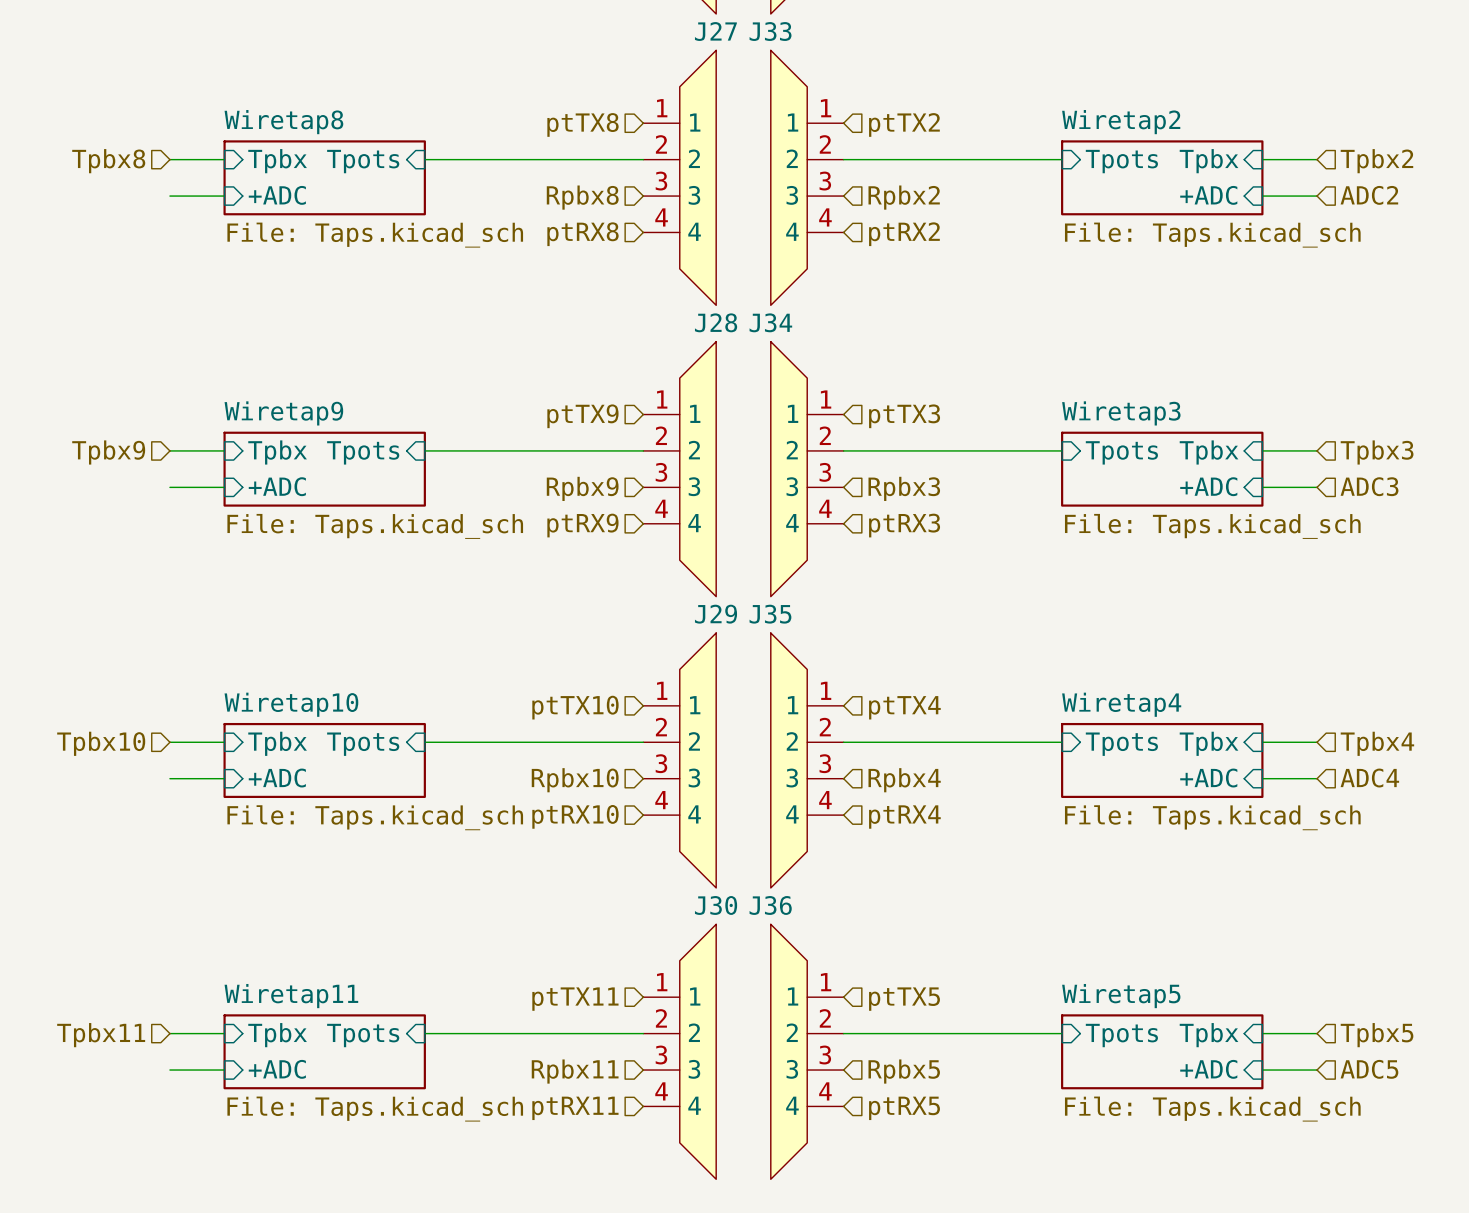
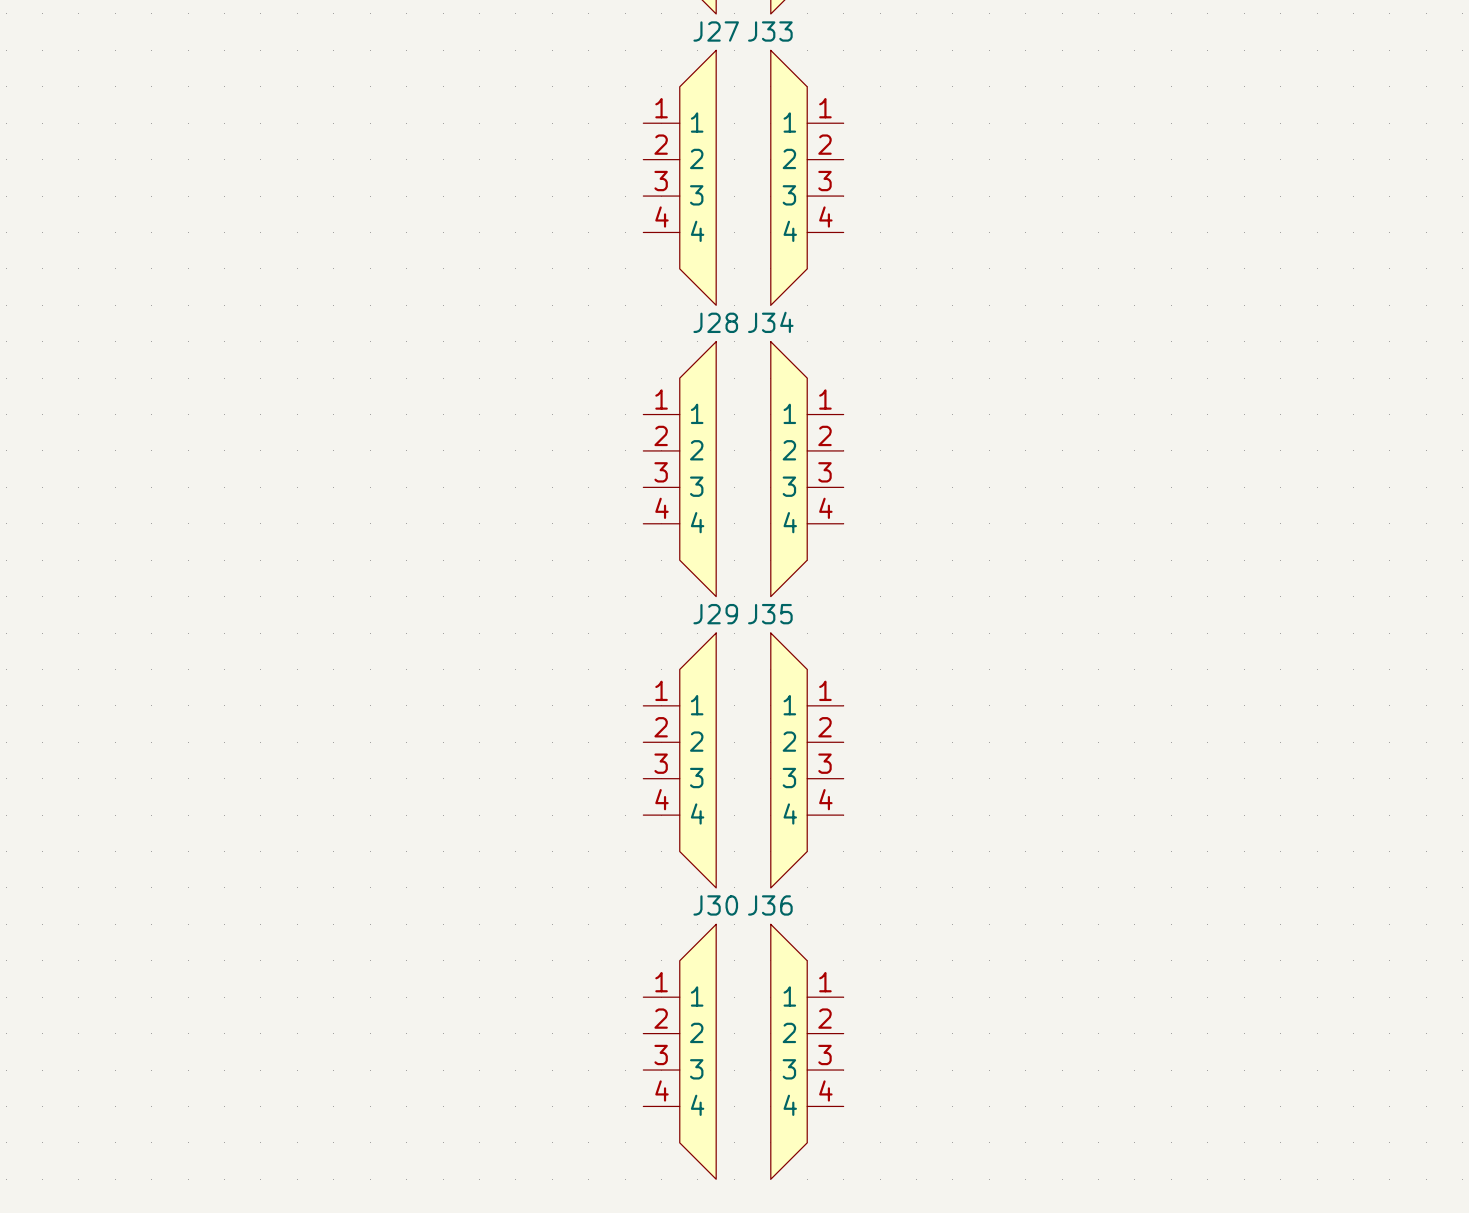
hierarchical label: ptTX8 (582, 124) -> none
hierarchical label: ptTX2 (904, 124) -> none
wire: (169, 159) (224, 159) -> none
wire: (424, 159) (643, 159) -> none
wire: (843, 159) (1062, 159) -> none
wire: (1262, 159) (1317, 159) -> none
hierarchical label: Tpbx8 (108, 161) -> none
sheet pin: Tpbx (277, 161) -> none
sheet pin: Tpots (363, 161) -> none
sheet pin: Tpots (1121, 161) -> none
sheet pin: Tpbx (1209, 161) -> none
hierarchical label: Tpbx2 (1376, 161) -> none
sheet Wiretap8: File: Taps.kicad_sch (324, 177) -> none
sheet Wiretap2: File: Taps.kicad_sch (1162, 177) -> none
sheet pin: +ADC (277, 195) -> none
sheet pin: +ADC (1208, 195) -> none
hierarchical label: ADC2 (1369, 195) -> none
wire: (169, 196) (224, 196) -> none
wire: (1262, 196) (1317, 196) -> none
hierarchical label: Rpbx8 (582, 197) -> none
hierarchical label: Rpbx2 (904, 197) -> none
hierarchical label: ptRX8 (582, 234) -> none
hierarchical label: ptRX2 (904, 234) -> none
hierarchical label: ptTX9 (582, 416) -> none
hierarchical label: ptTX3 (904, 416) -> none
wire: (169, 450) (224, 450) -> none
wire: (424, 450) (643, 450) -> none
wire: (843, 450) (1062, 450) -> none
wire: (1262, 450) (1317, 450) -> none
hierarchical label: Tpbx9 (108, 452) -> none
sheet pin: Tpbx (277, 452) -> none
sheet pin: Tpots (363, 452) -> none
sheet pin: Tpots (1121, 452) -> none
sheet pin: Tpbx (1209, 452) -> none
hierarchical label: Tpbx3 (1377, 452) -> none
sheet Wiretap9: File: Taps.kicad_sch (324, 469) -> none
sheet Wiretap3: File: Taps.kicad_sch (1162, 469) -> none
sheet pin: +ADC (277, 486) -> none
sheet pin: +ADC (1208, 486) -> none
hierarchical label: ADC3 (1369, 486) -> none
wire: (169, 487) (224, 487) -> none
wire: (1262, 487) (1317, 487) -> none
hierarchical label: Rpbx9 (582, 488) -> none
hierarchical label: Rpbx3 (904, 488) -> none
hierarchical label: ptRX9 (582, 525) -> none
hierarchical label: ptRX3 (904, 525) -> none
hierarchical label: ptTX10 (575, 707) -> none
hierarchical label: ptTX4 (904, 707) -> none
wire: (169, 742) (224, 742) -> none
wire: (424, 742) (643, 742) -> none
wire: (843, 742) (1062, 742) -> none
wire: (1262, 742) (1317, 742) -> none
hierarchical label: Tpbx10 (101, 743) -> none
sheet pin: Tpbx (277, 743) -> none
sheet pin: Tpbx (1209, 743) -> none
hierarchical label: Tpbx4 (1377, 743) -> none
sheet pin: Tpots (363, 744) -> none
sheet pin: Tpots (1121, 744) -> none
sheet Wiretap10: File: Taps.kicad_sch (324, 760) -> none
sheet Wiretap4: File: Taps.kicad_sch (1162, 760) -> none
wire: (169, 778) (224, 778) -> none
sheet pin: +ADC (277, 778) -> none
sheet pin: +ADC (1208, 778) -> none
wire: (1262, 778) (1317, 778) -> none
hierarchical label: ADC4 (1369, 778) -> none
hierarchical label: Rpbx10 (575, 780) -> none
hierarchical label: Rpbx4 (904, 780) -> none
hierarchical label: ptRX10 (575, 816) -> none
hierarchical label: ptRX4 (904, 817) -> none
hierarchical label: ptTX11 (575, 999) -> none
hierarchical label: ptTX5 (904, 999) -> none
wire: (169, 1033) (224, 1033) -> none
wire: (424, 1033) (643, 1033) -> none
wire: (843, 1033) (1062, 1033) -> none
wire: (1262, 1033) (1317, 1033) -> none
hierarchical label: Tpbx11 (101, 1035) -> none
sheet pin: Tpbx (277, 1035) -> none
sheet pin: Tpots (363, 1035) -> none
sheet pin: Tpots (1121, 1035) -> none
sheet pin: Tpbx (1209, 1035) -> none
hierarchical label: Tpbx5 (1377, 1035) -> none
sheet Wiretap11: File: Taps.kicad_sch (324, 1051) -> none
sheet Wiretap5: File: Taps.kicad_sch (1162, 1051) -> none
sheet pin: +ADC (277, 1069) -> none
sheet pin: +ADC (1208, 1069) -> none
hierarchical label: ADC5 (1369, 1069) -> none
wire: (169, 1070) (224, 1070) -> none
wire: (1262, 1070) (1317, 1070) -> none
hierarchical label: Rpbx11 (575, 1071) -> none
hierarchical label: Rpbx5 (904, 1071) -> none
hierarchical label: ptRX11 (575, 1108) -> none
hierarchical label: ptRX5 (904, 1108) -> none

